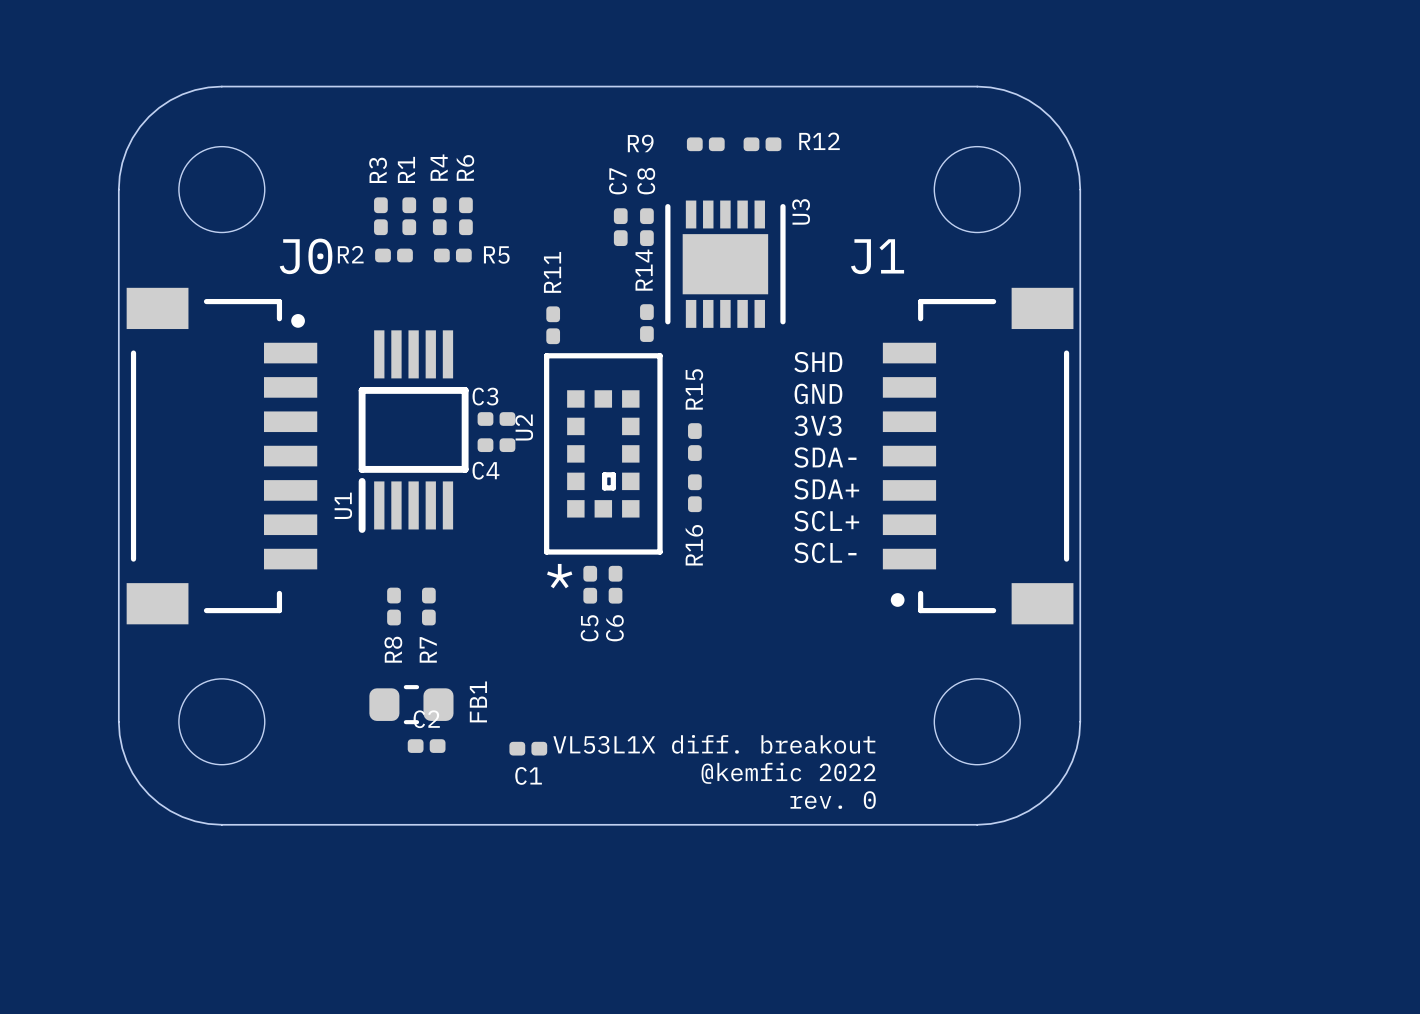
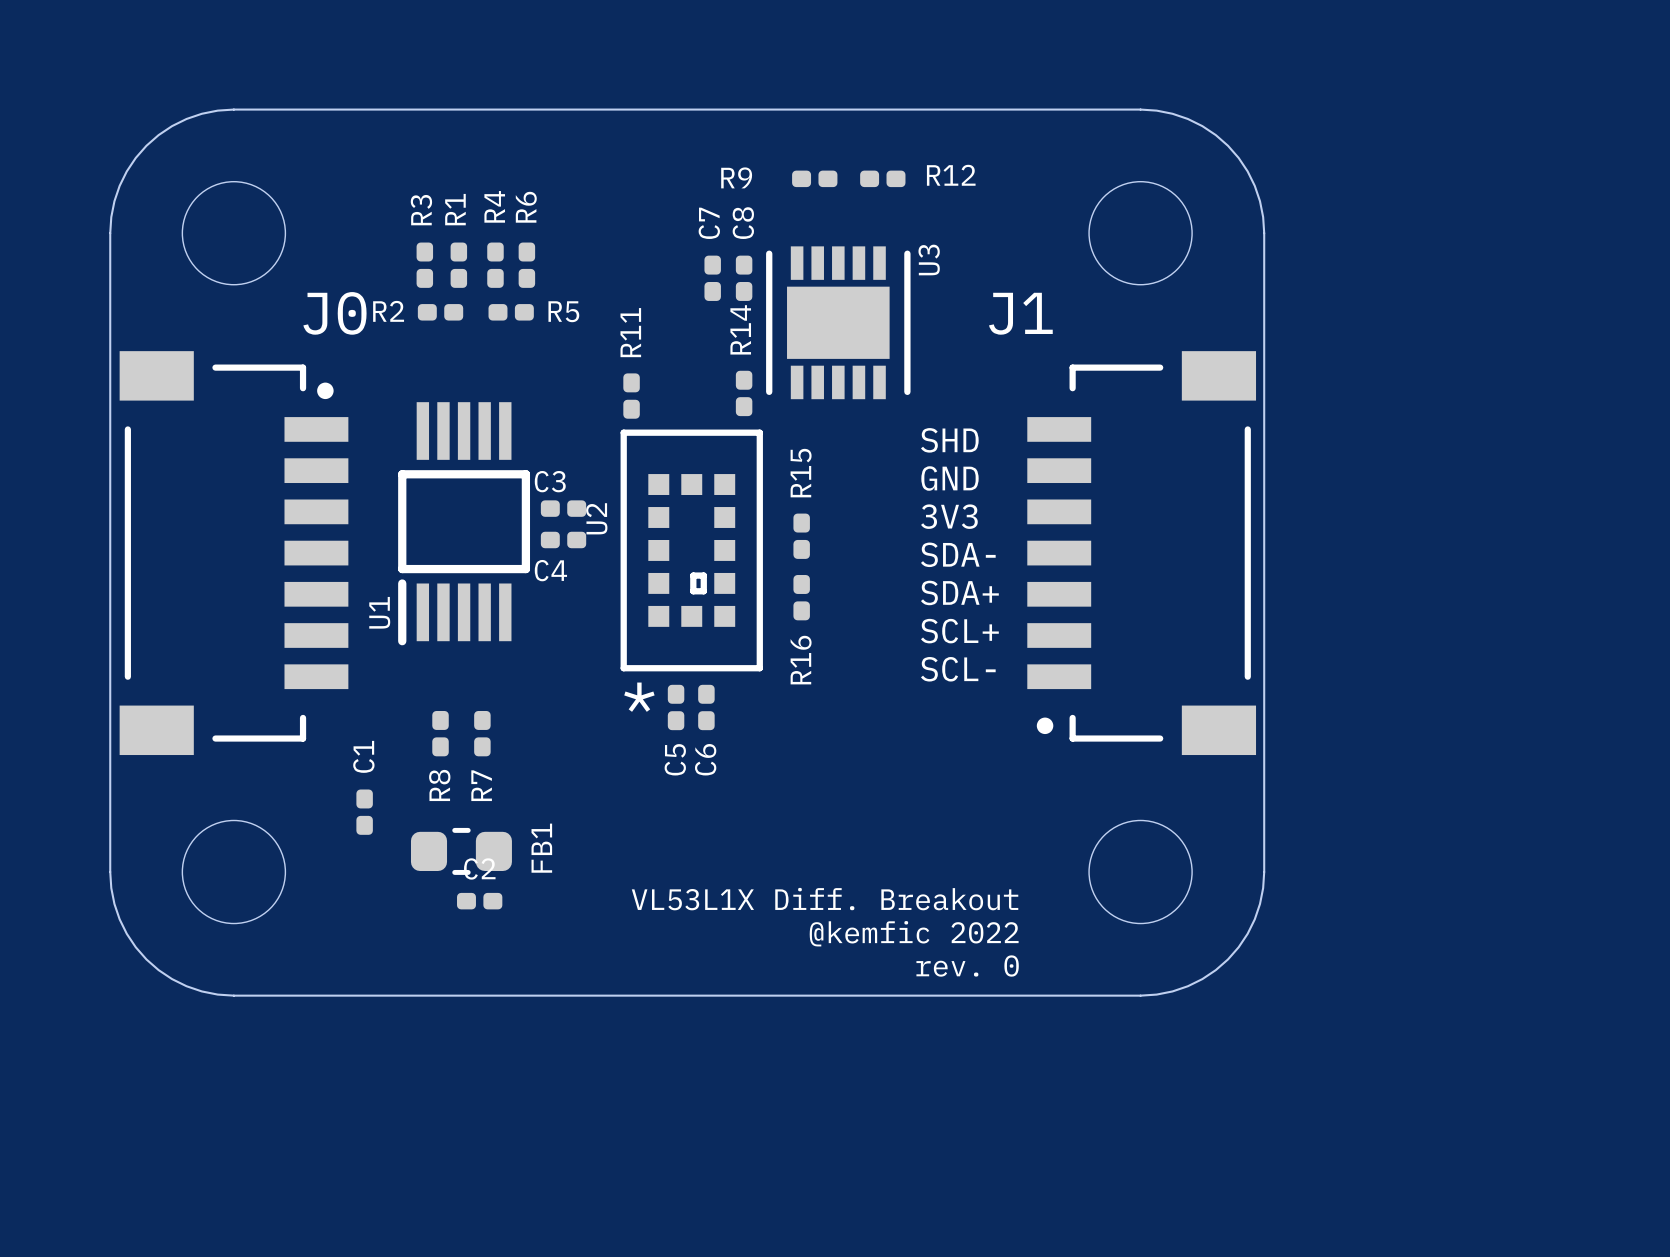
text: VL53L1X diff. breakout (714, 744) -> VL53L1X Diff. Breakout (825, 899)
C1 rotation: 0° (528, 748) -> 90° clockwise (364, 812)
C1 position: (528, 748) -> (364, 812)

